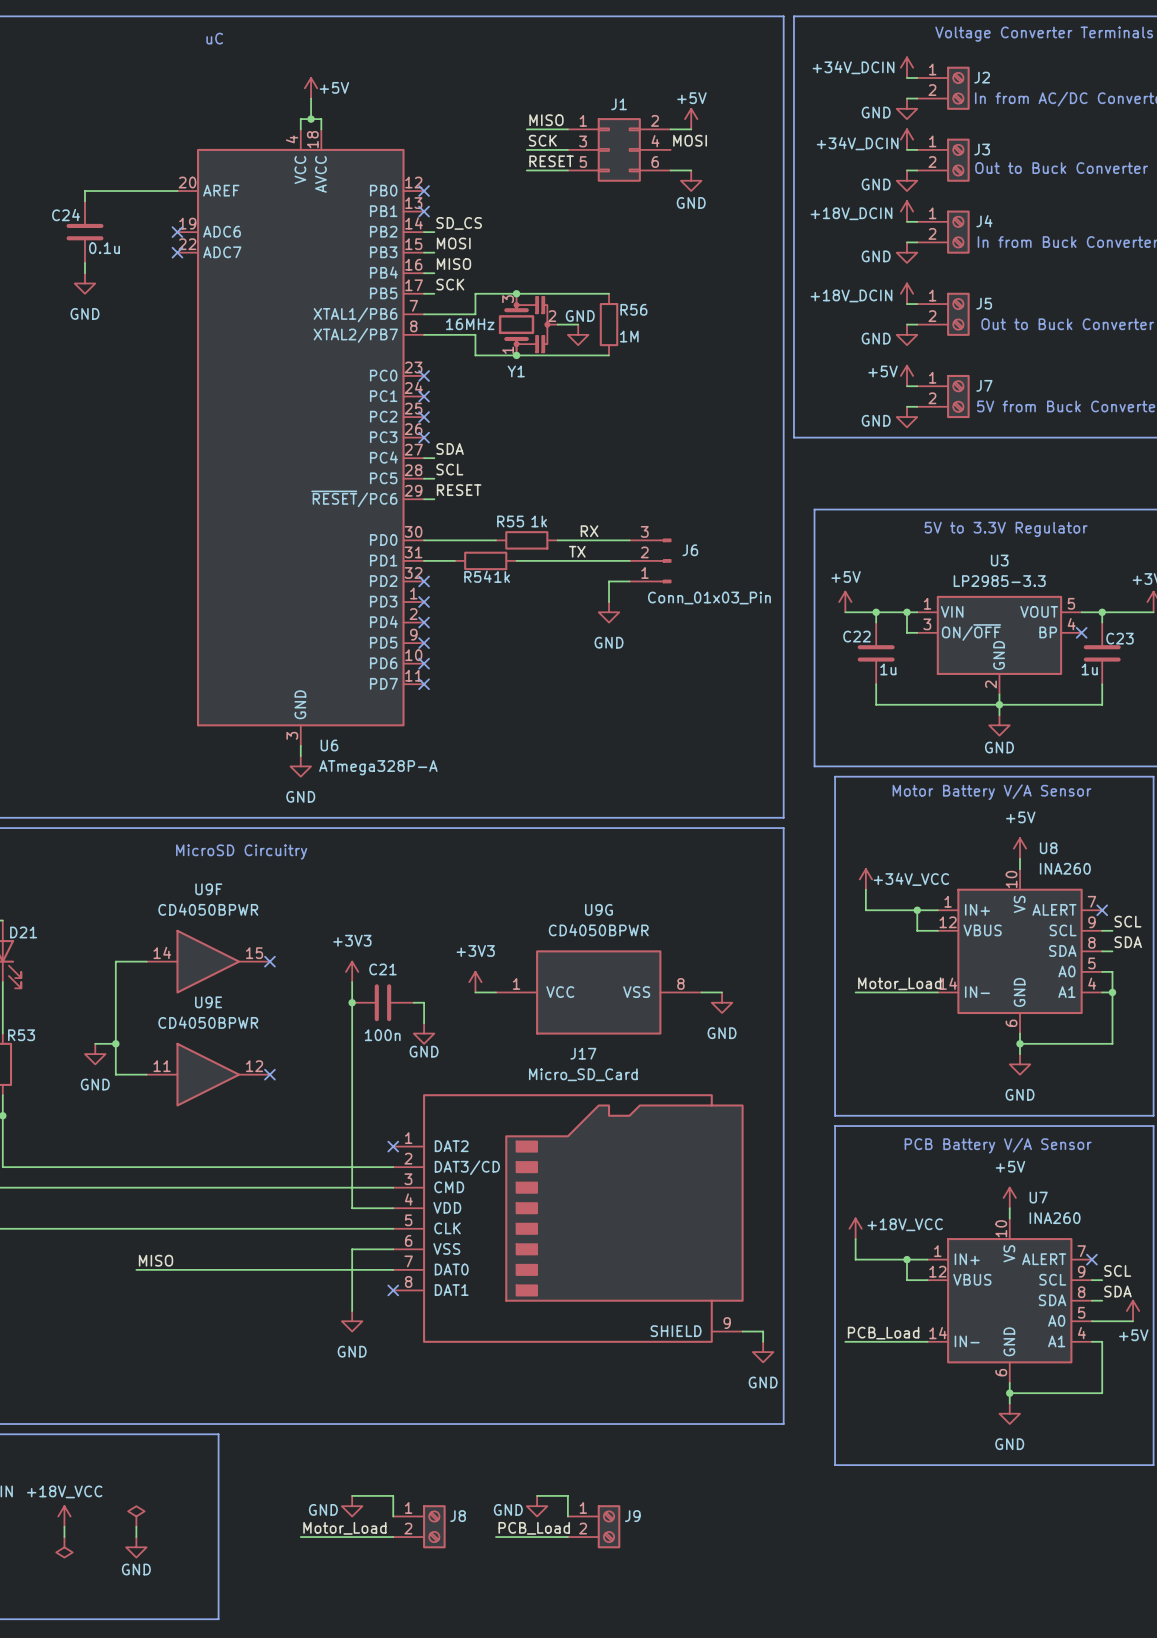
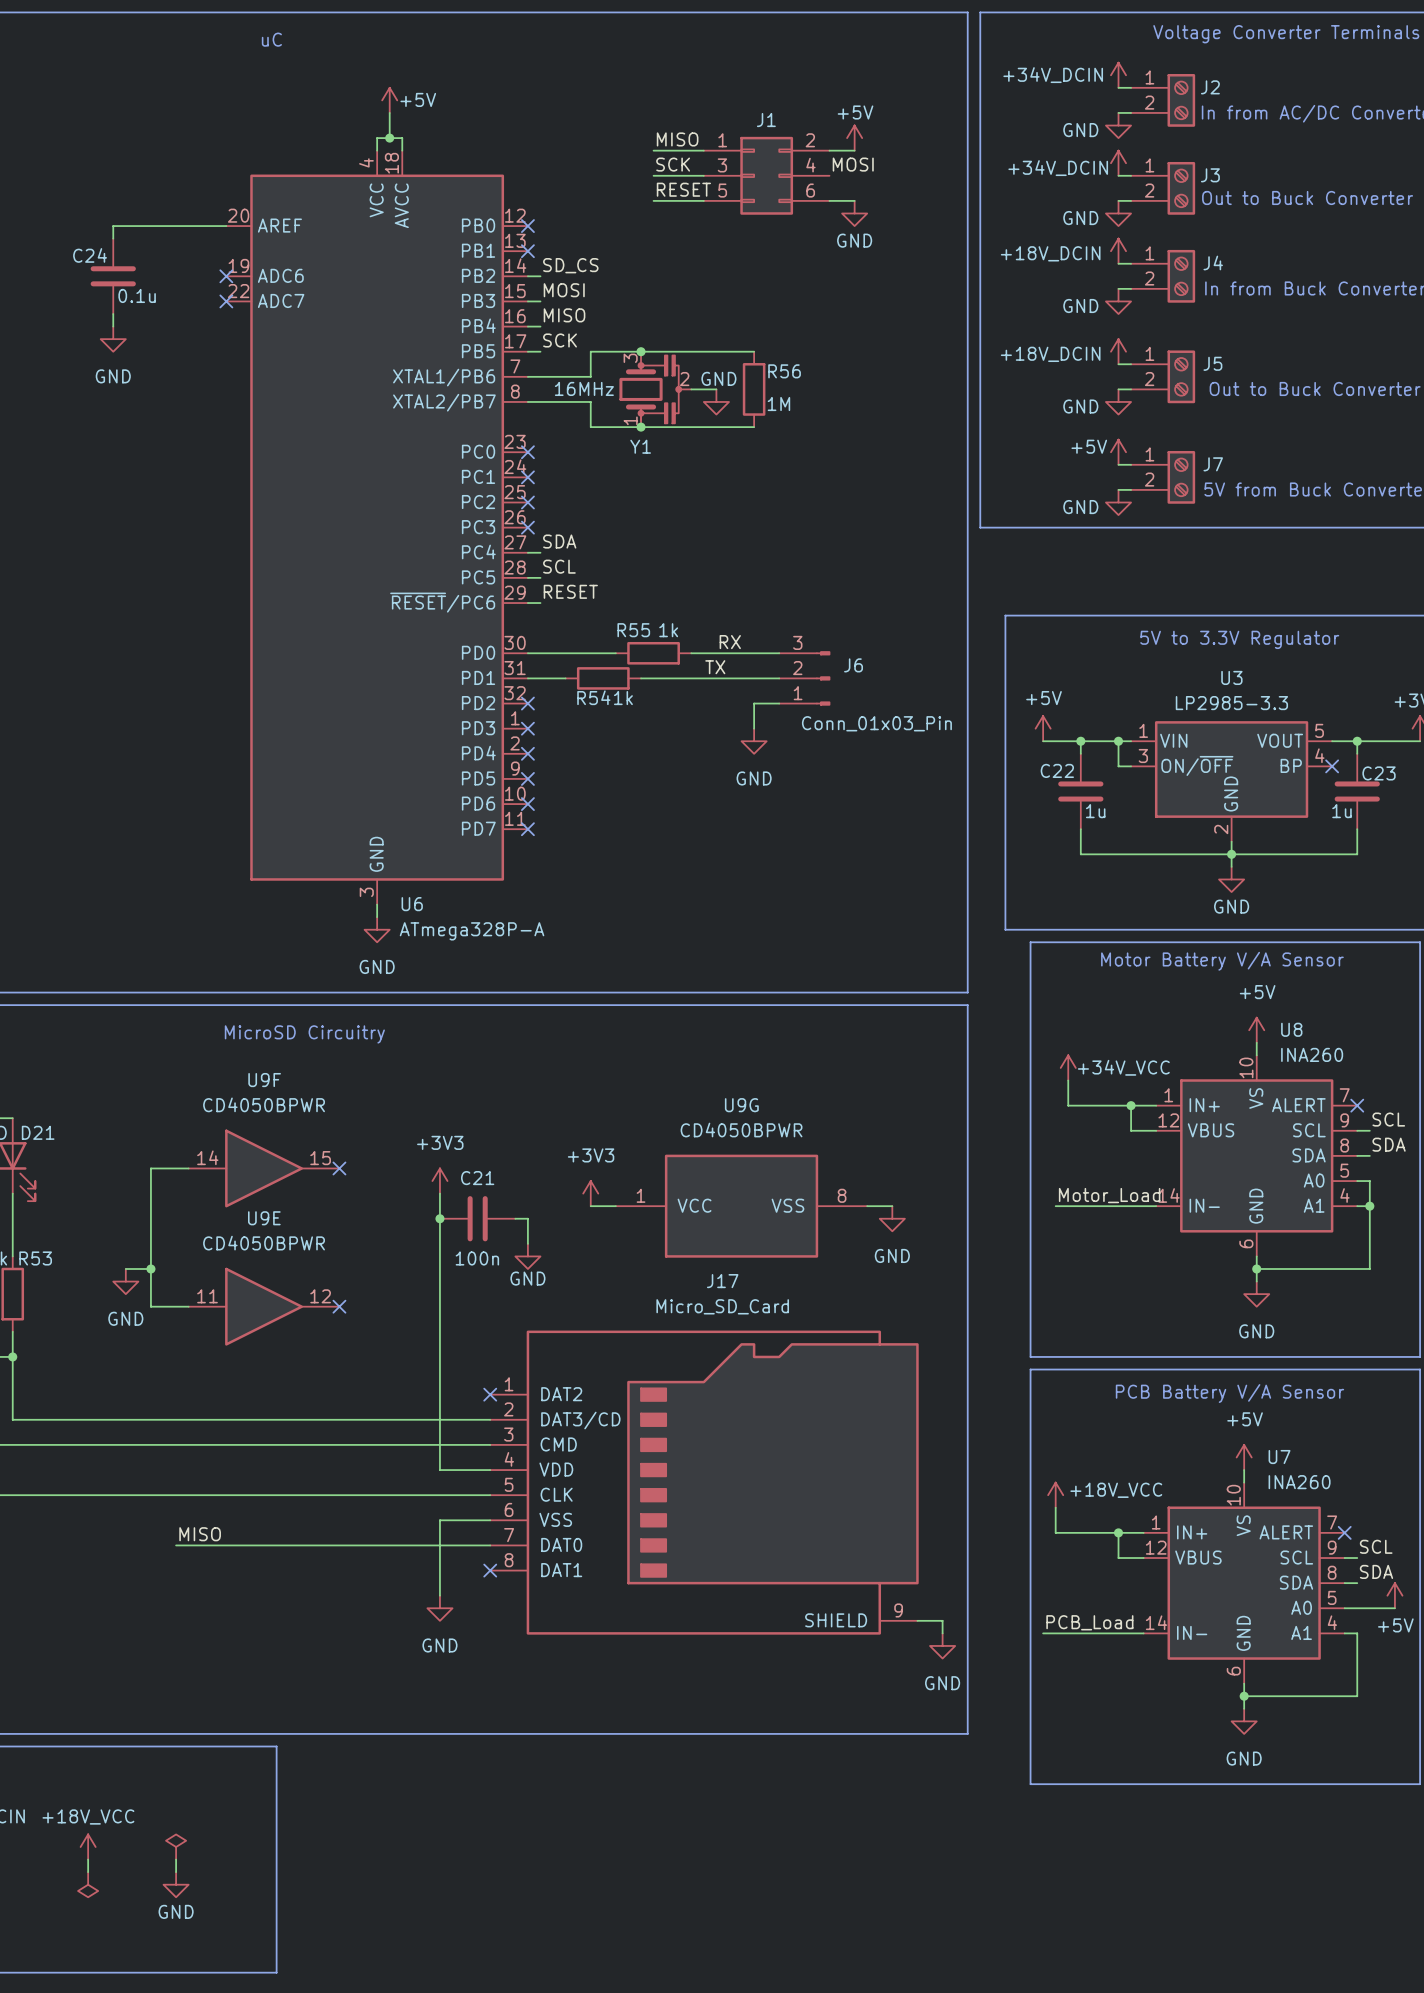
wire: (352, 1495) (393, 1495) (393, 1516) -> none
wire: (537, 1495) (567, 1495) (567, 1516) -> none
power symbol: GND (352, 1506) -> none
power symbol: GND (537, 1506) -> none
J8: (419, 1526) -> none
J9: (594, 1526) -> none
label: Motor_Load (344, 1528) -> none
label: PCB_Load (534, 1528) -> none
wire: (300, 1537) (393, 1537) -> none
wire: (495, 1537) (567, 1537) -> none

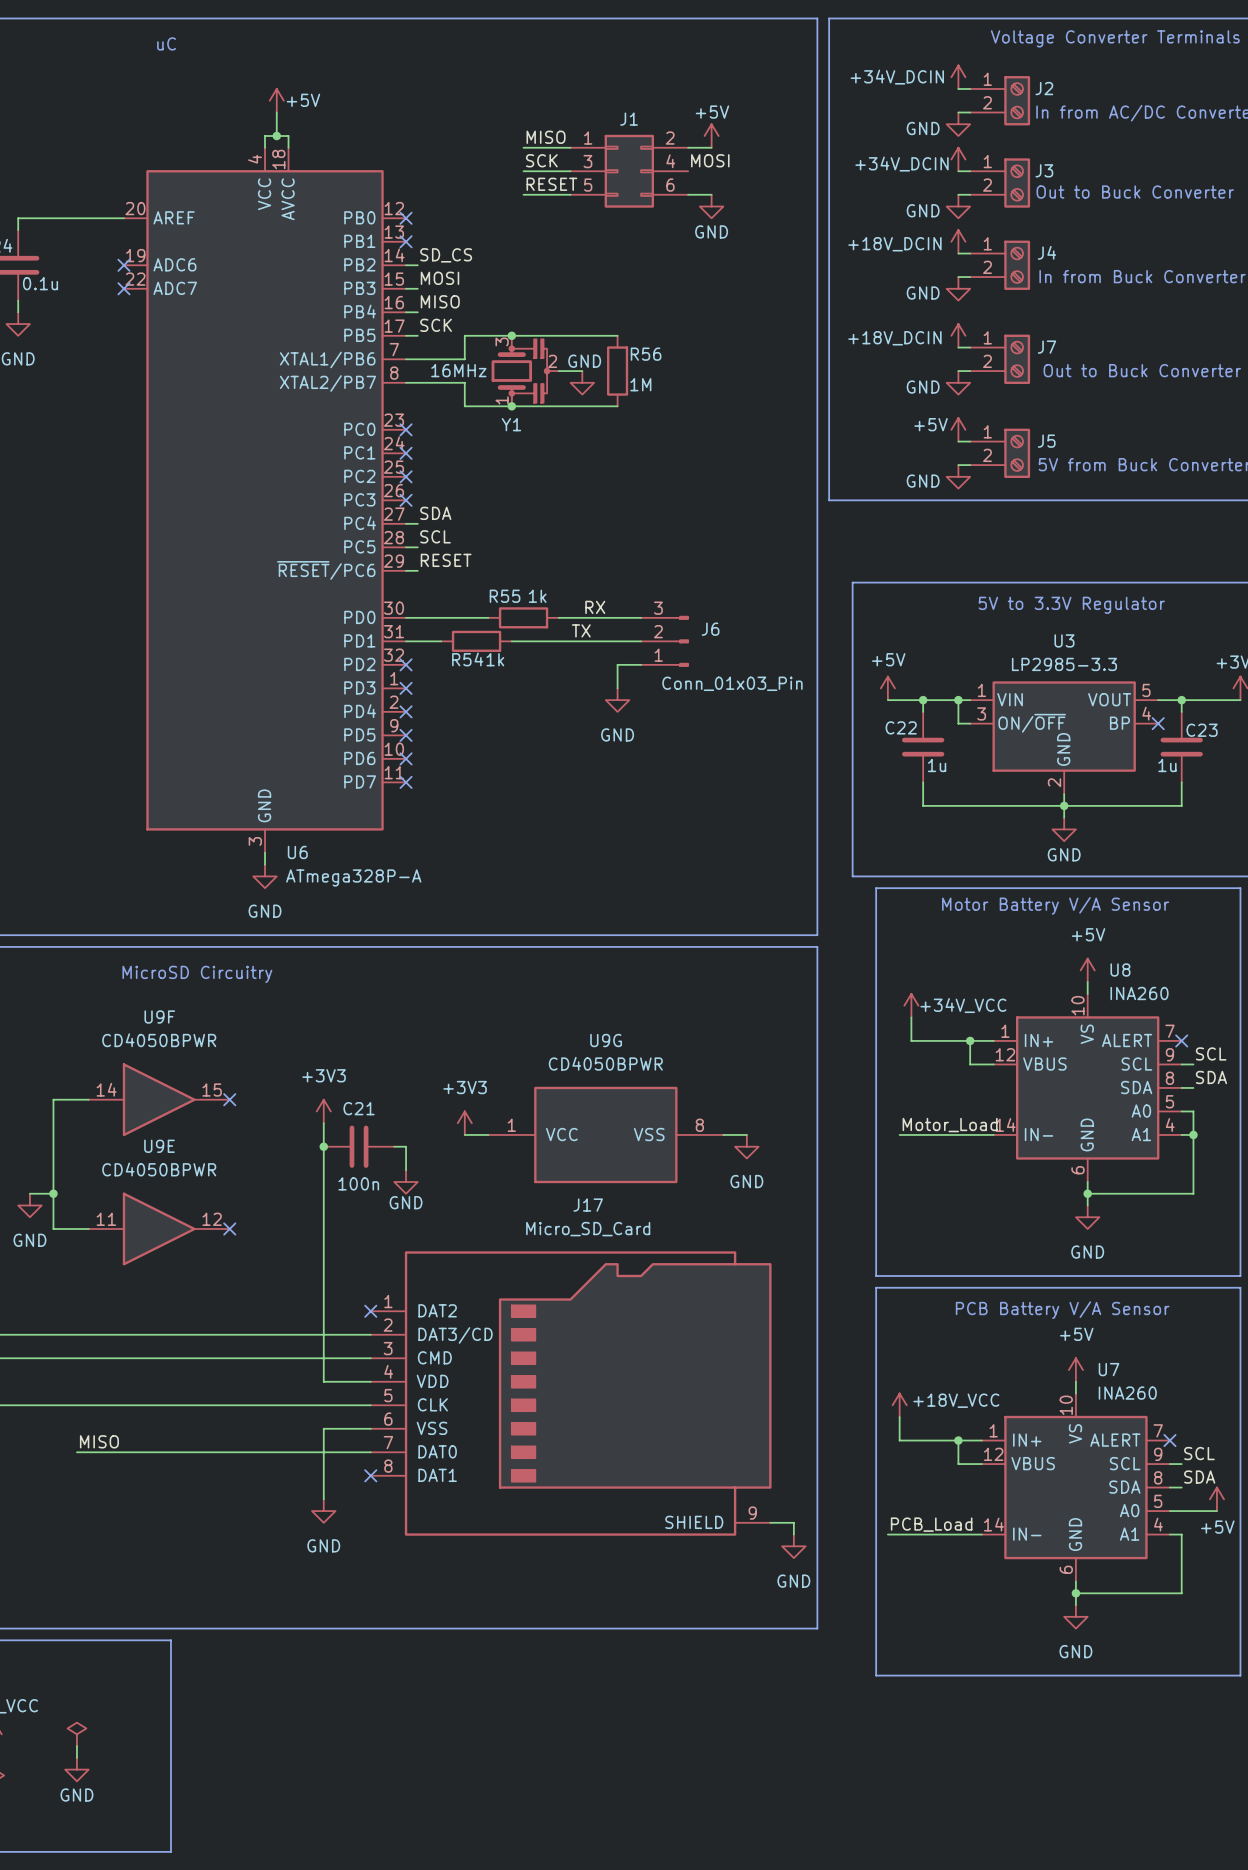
J5 name: J5 (1212, 363) -> J7 (1046, 347)
J7 name: J7 (1213, 464) -> J5 (1046, 441)

